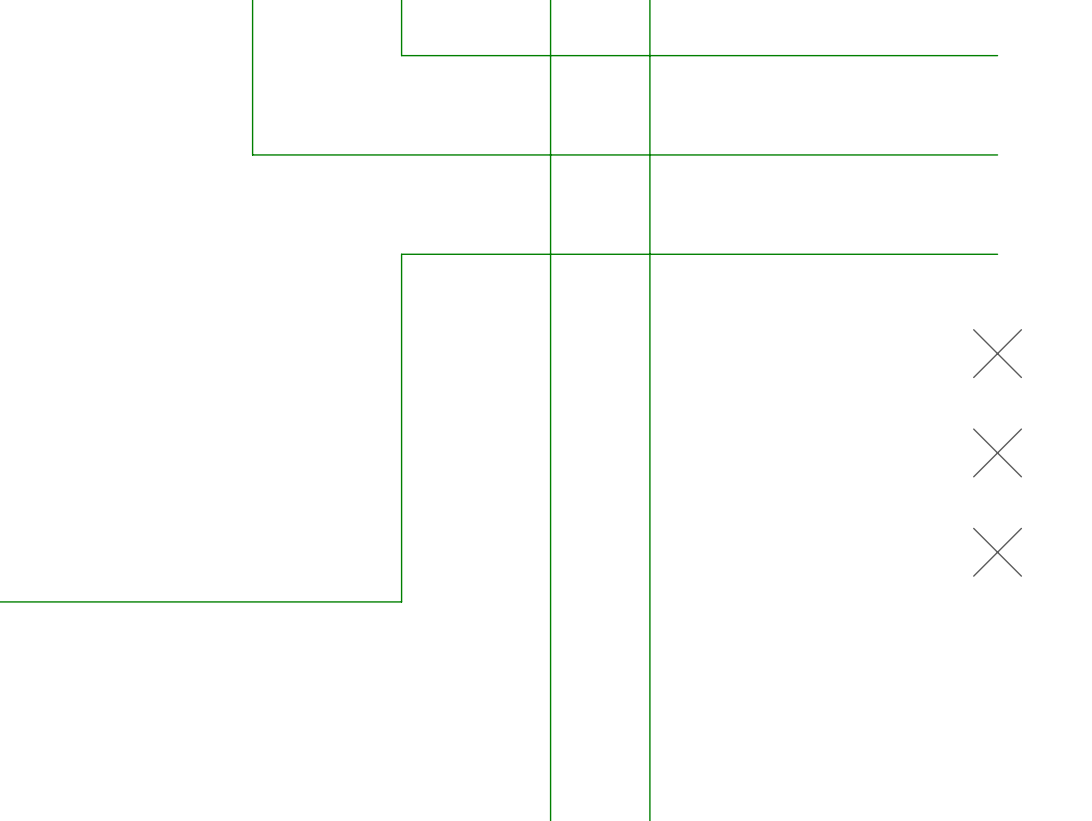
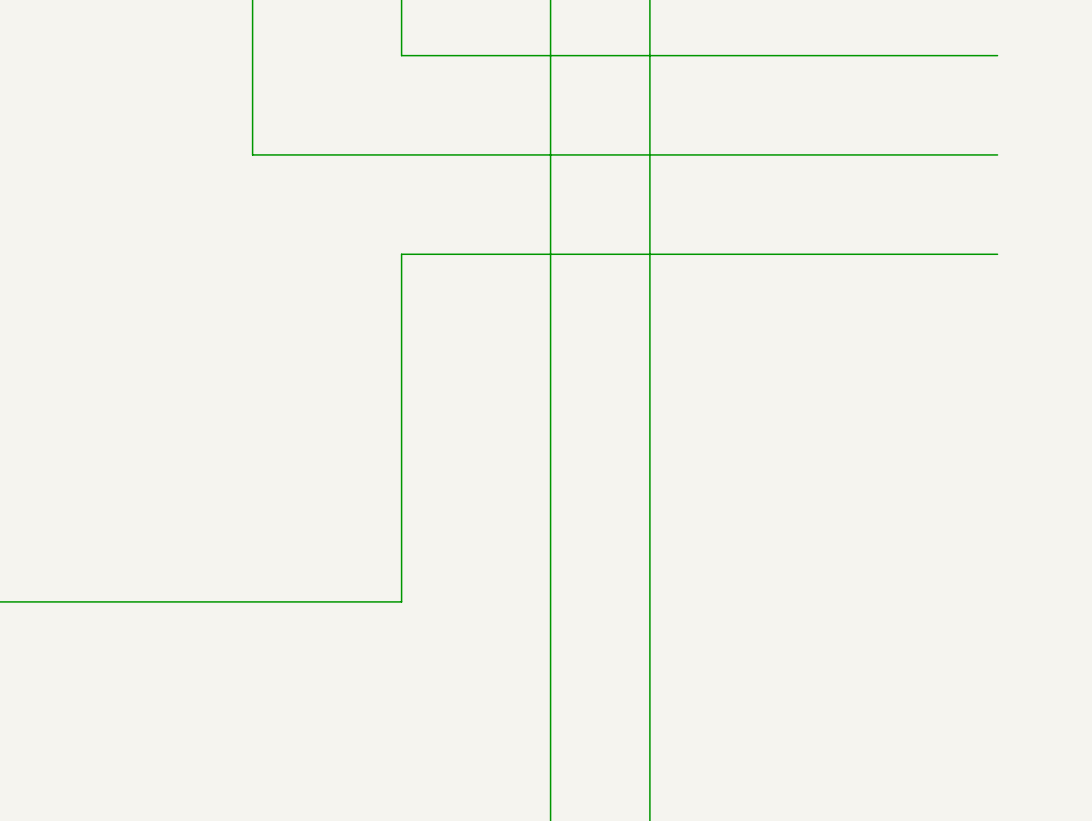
no-connect mark: (997, 353) -> none
no-connect mark: (997, 452) -> none
no-connect mark: (997, 552) -> none

